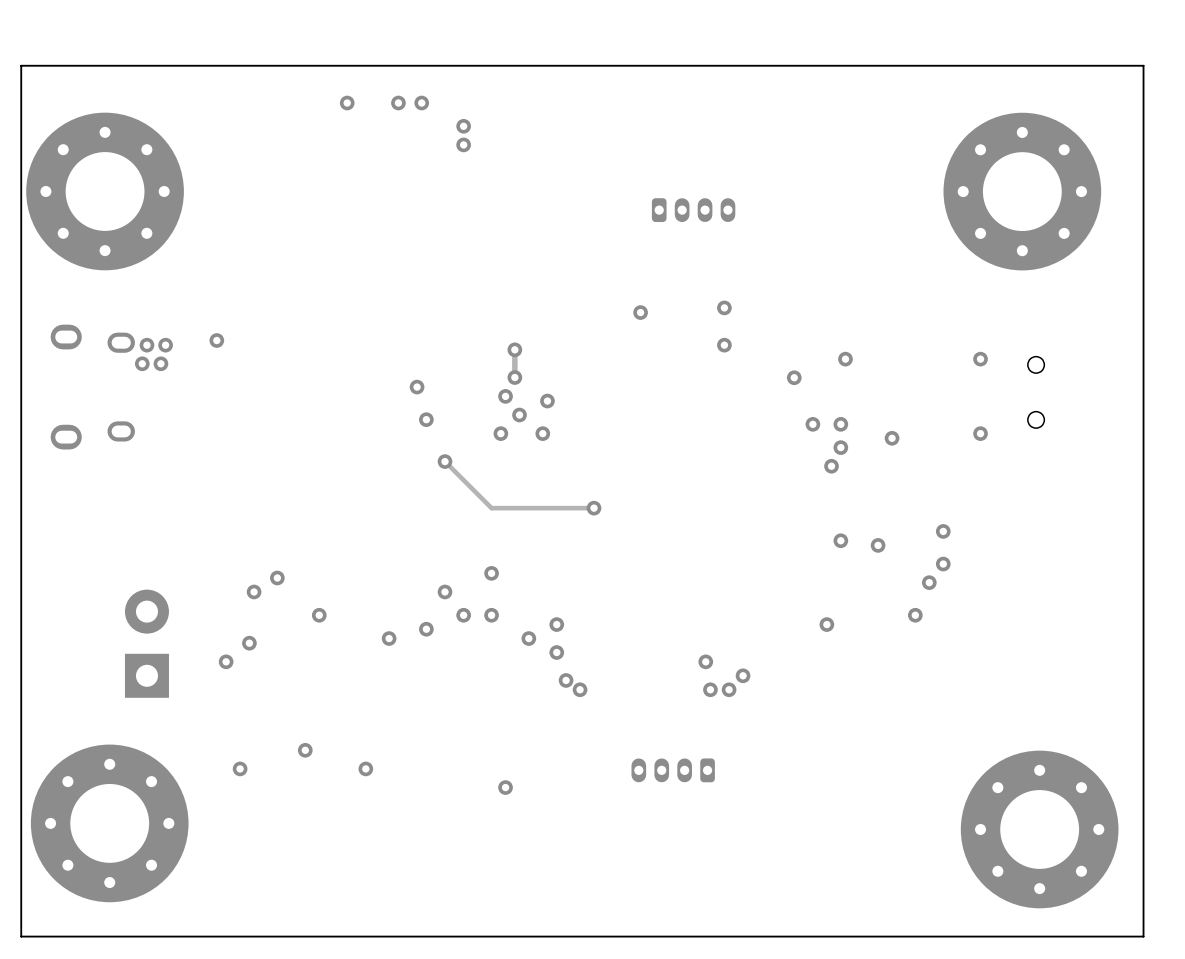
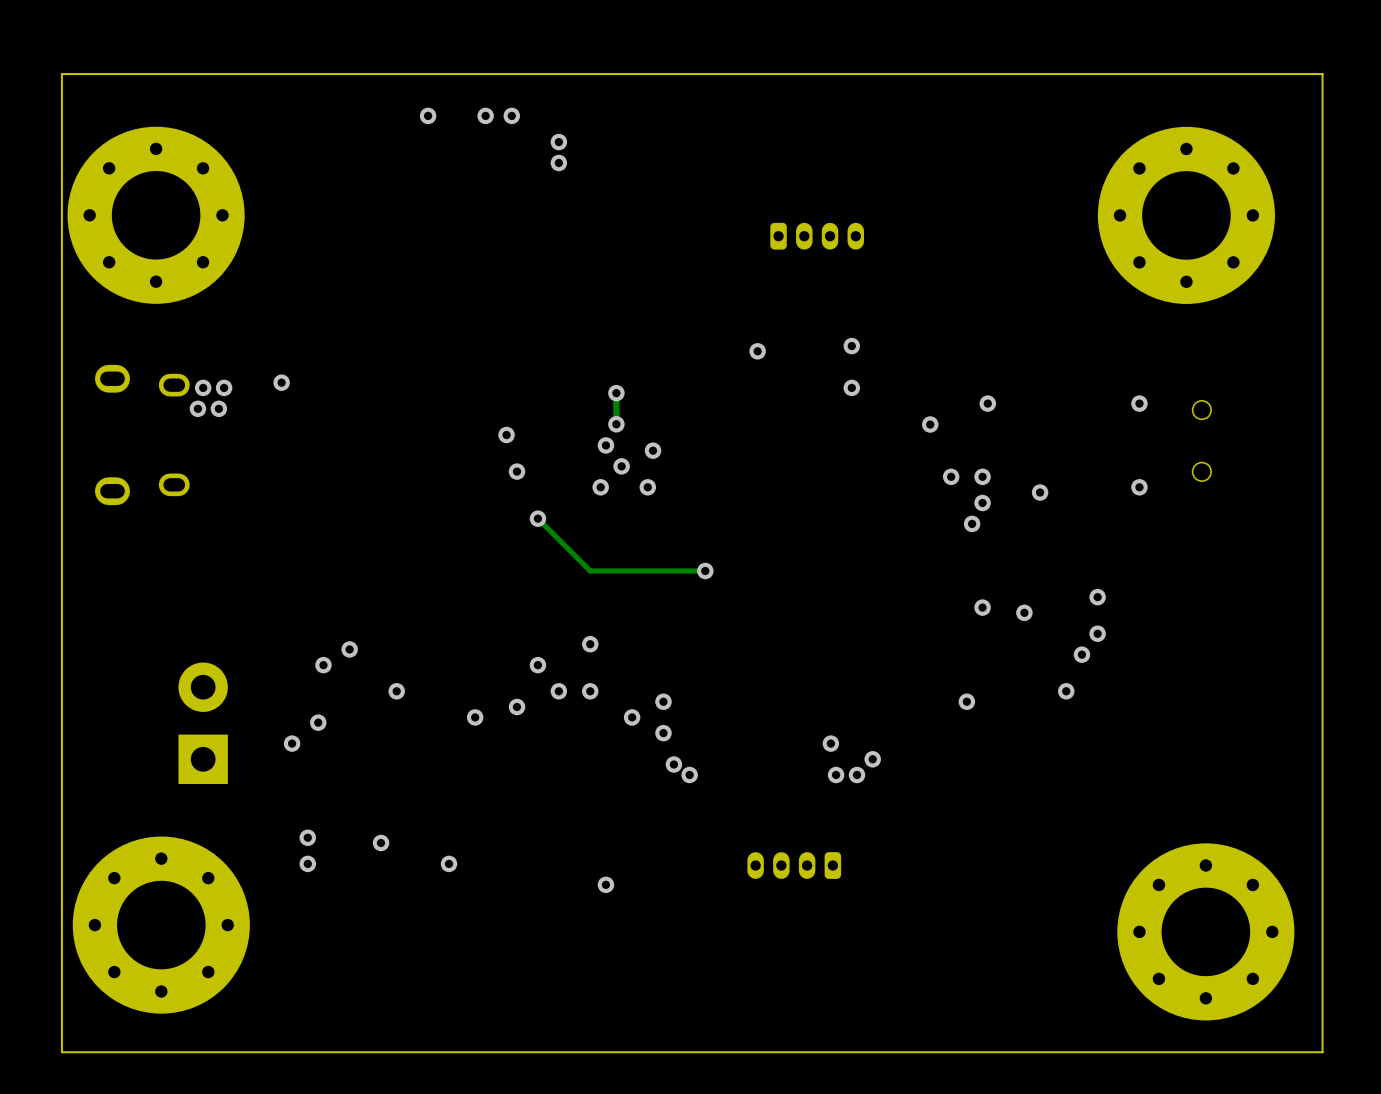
via: none -> (307, 837)

